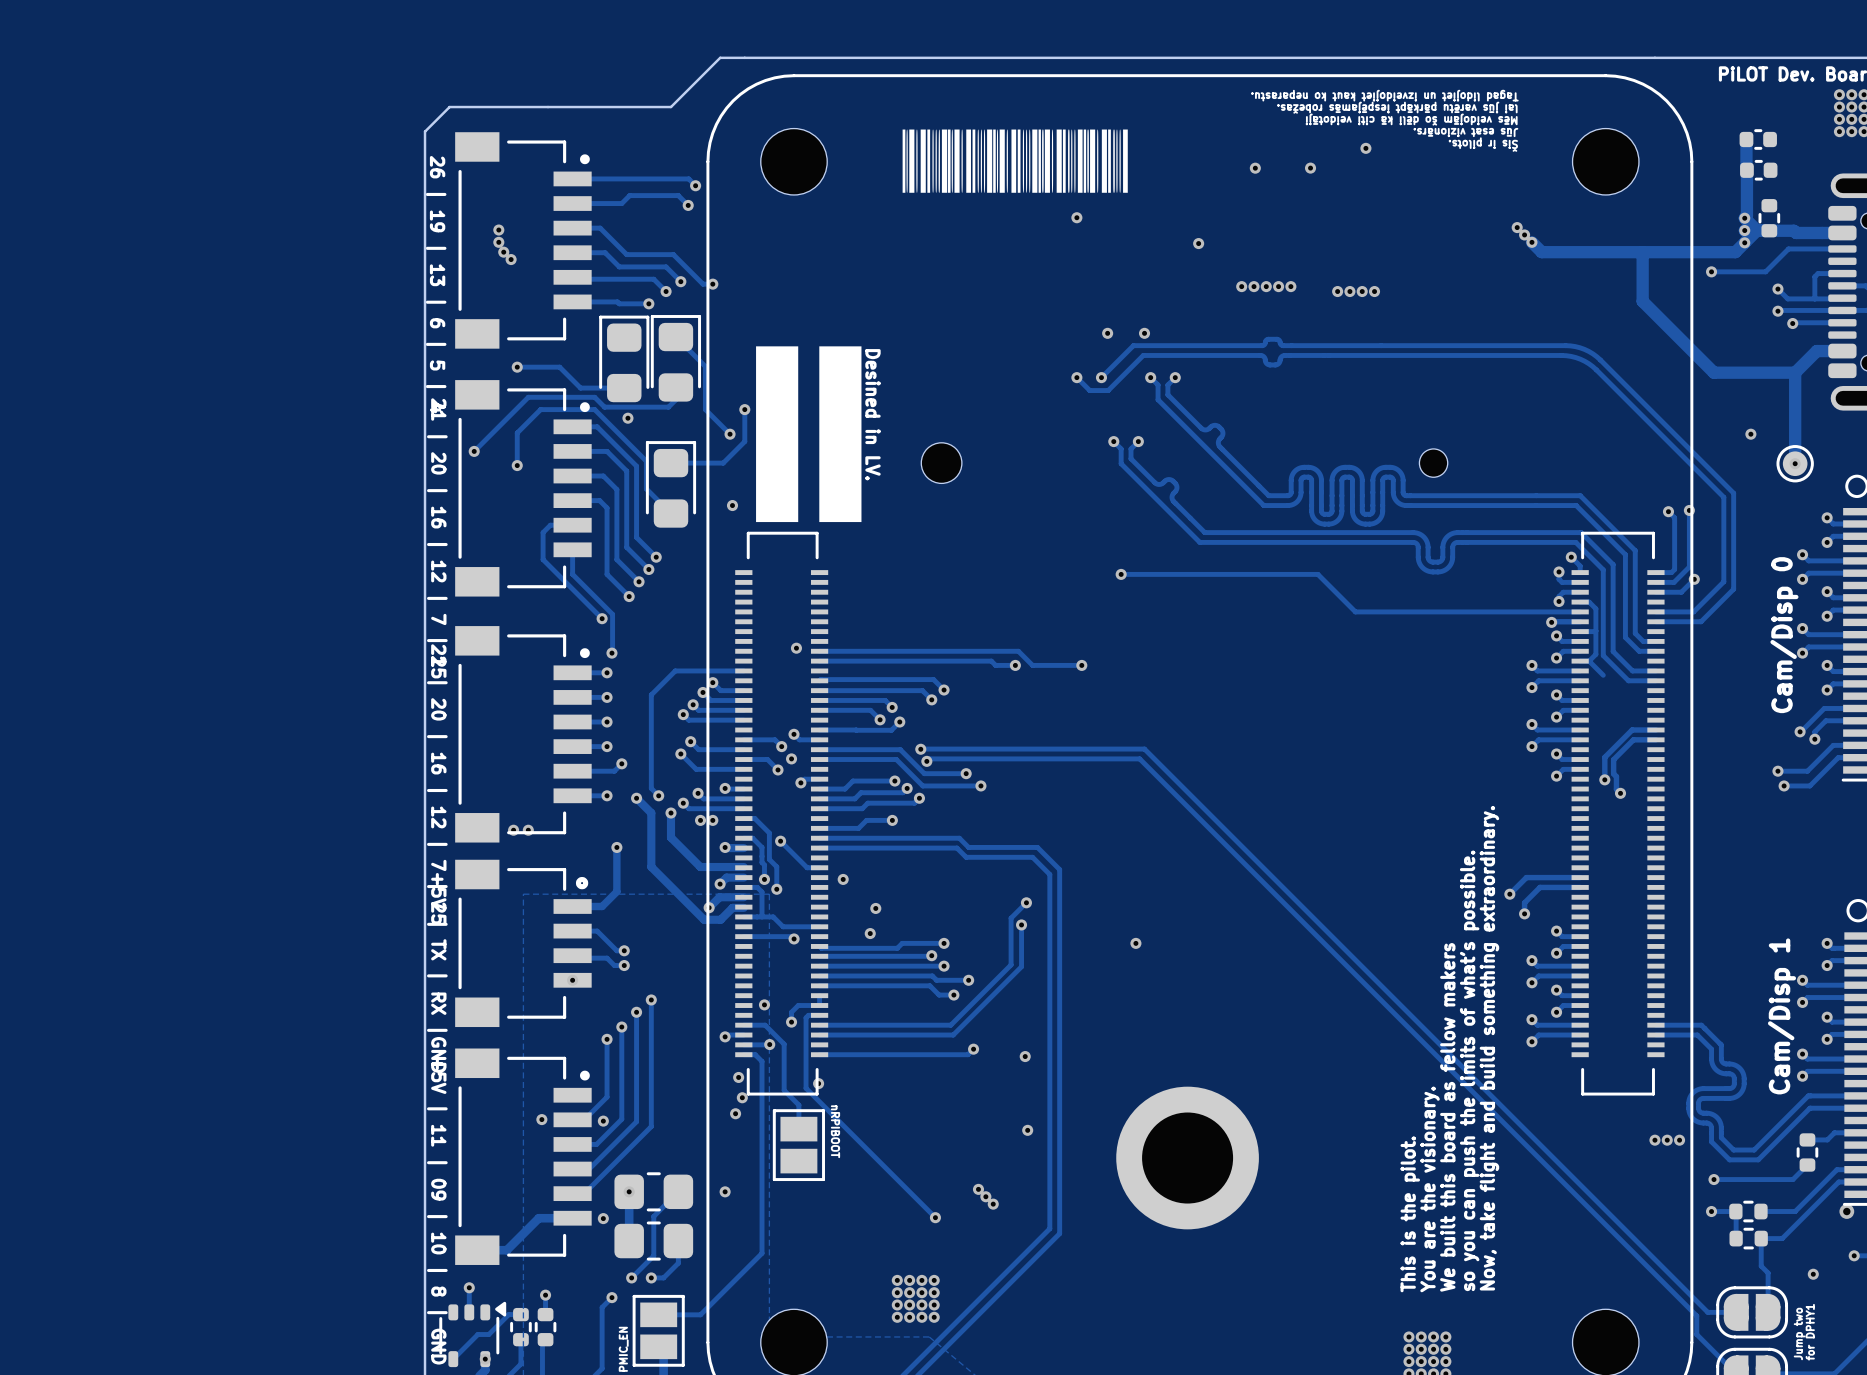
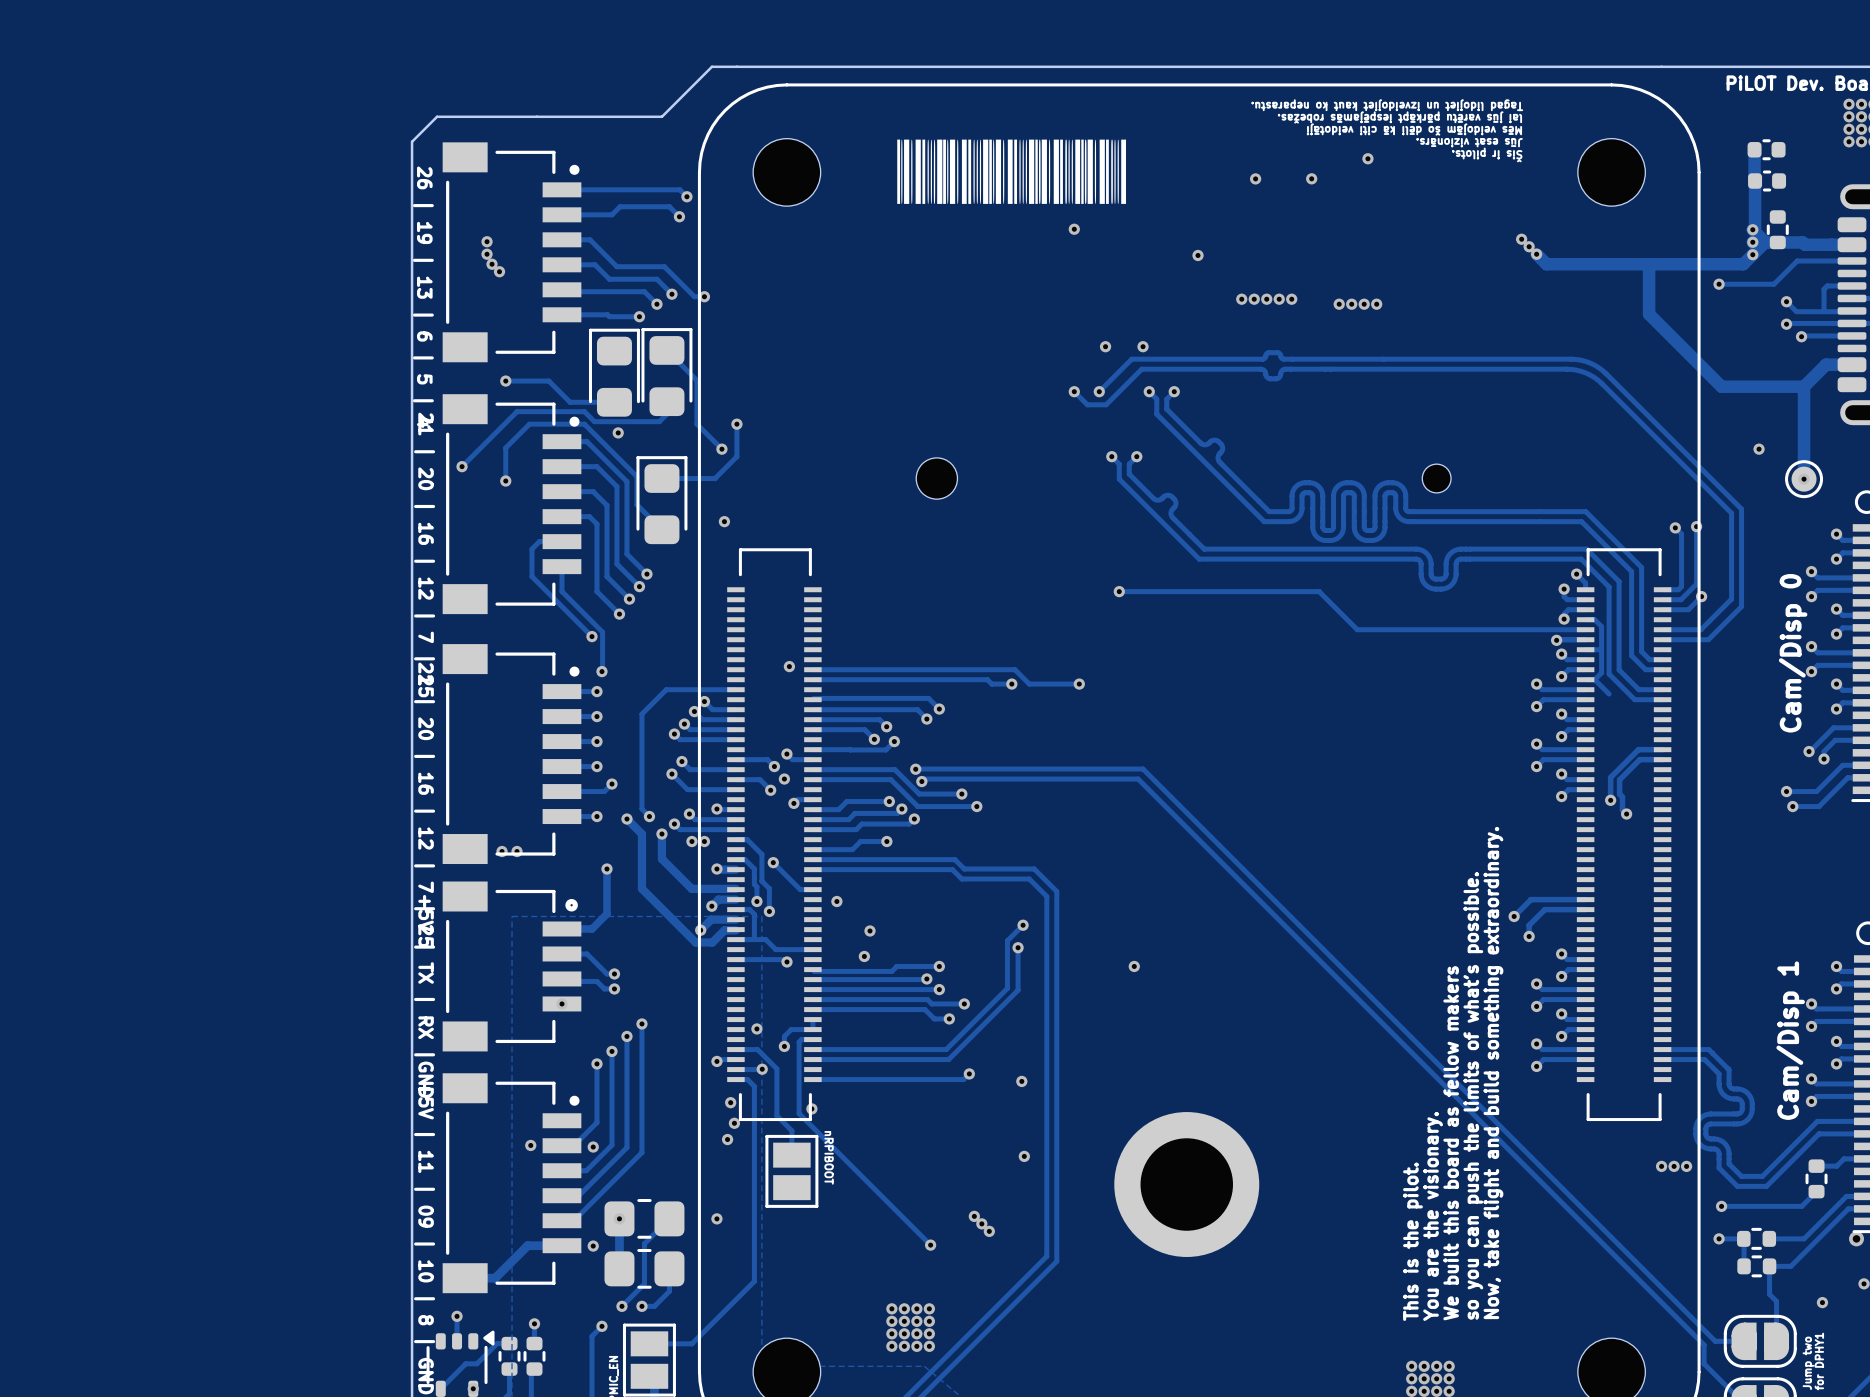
drawing: [756, 346, 862, 523] -> none
text: Desined in LV. (872, 414) -> none

